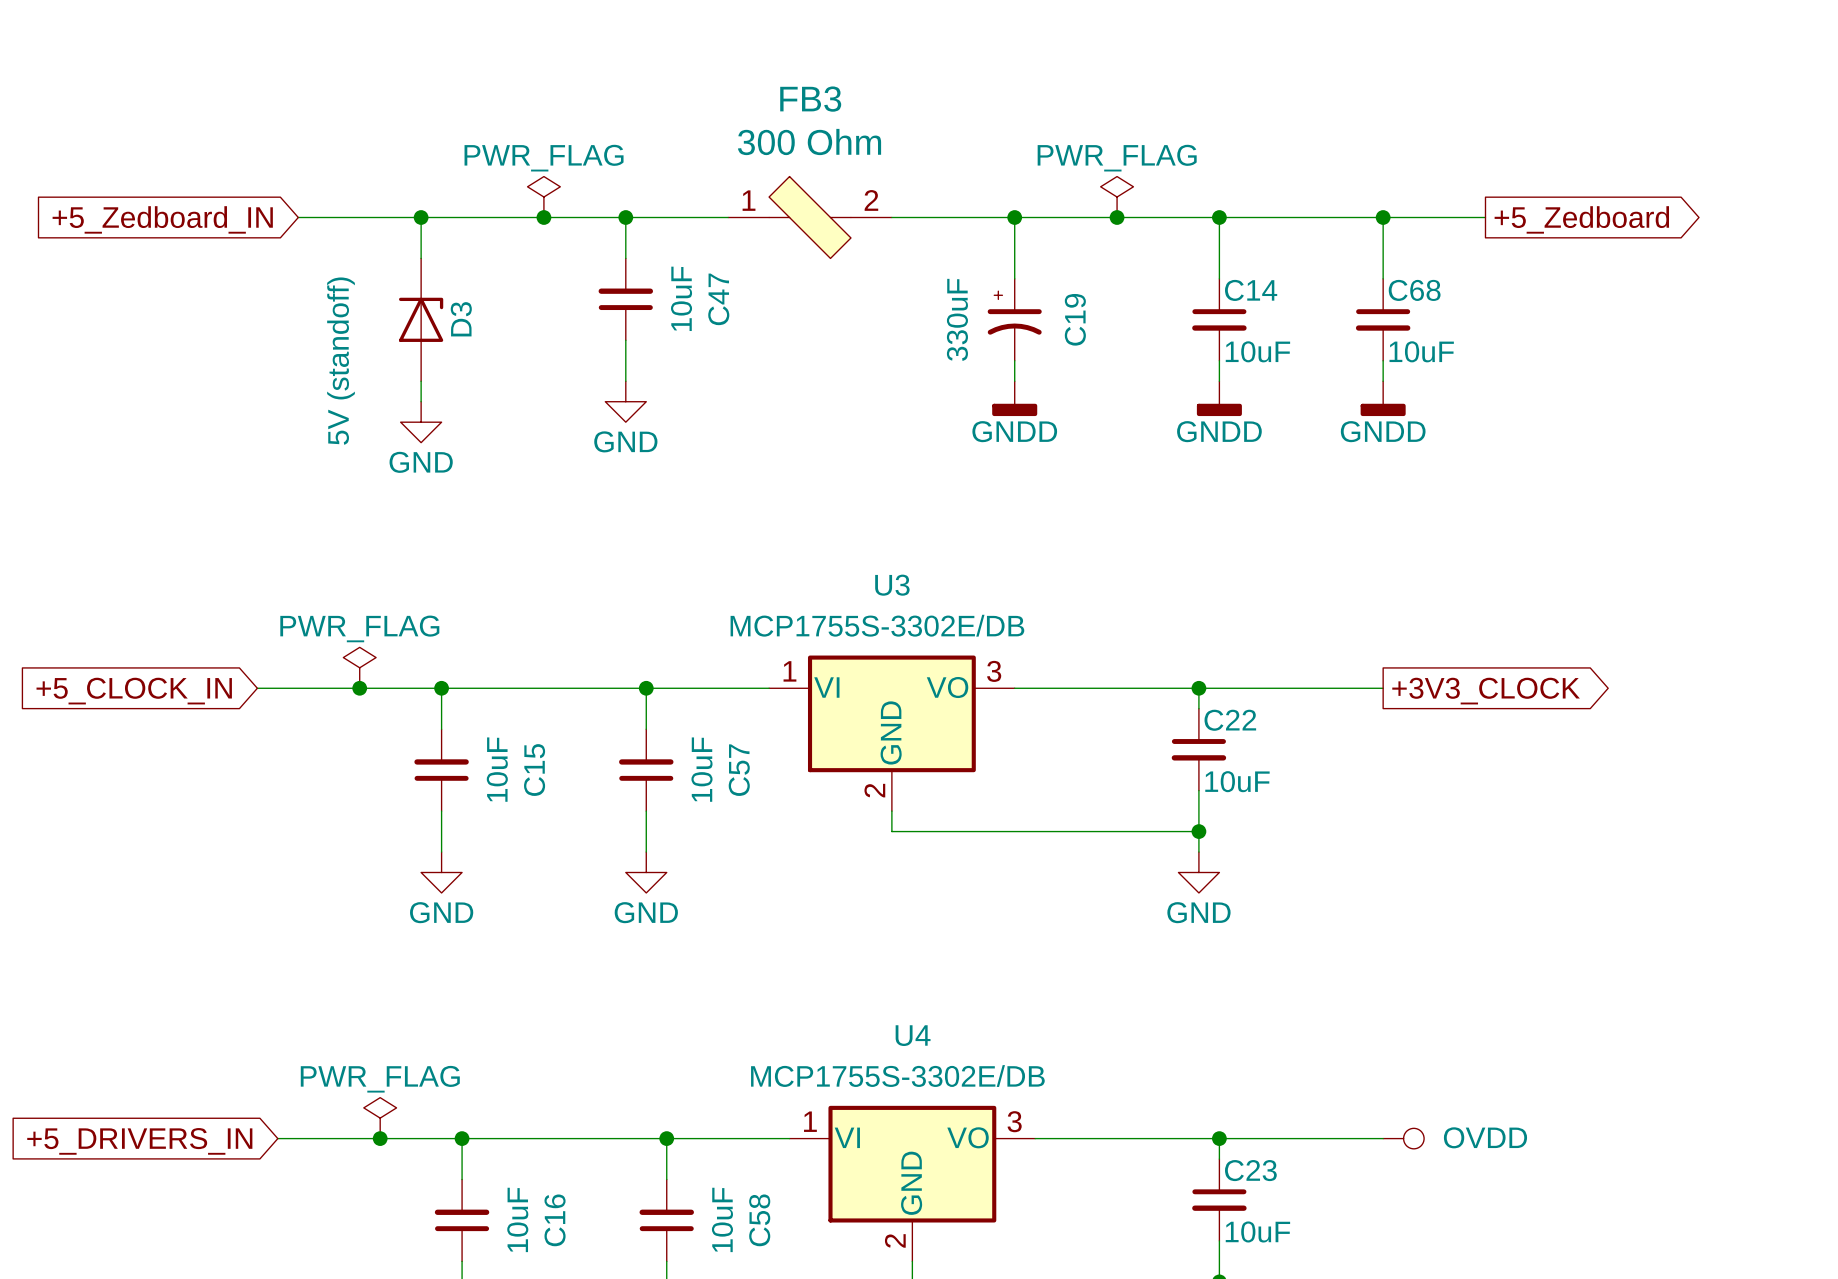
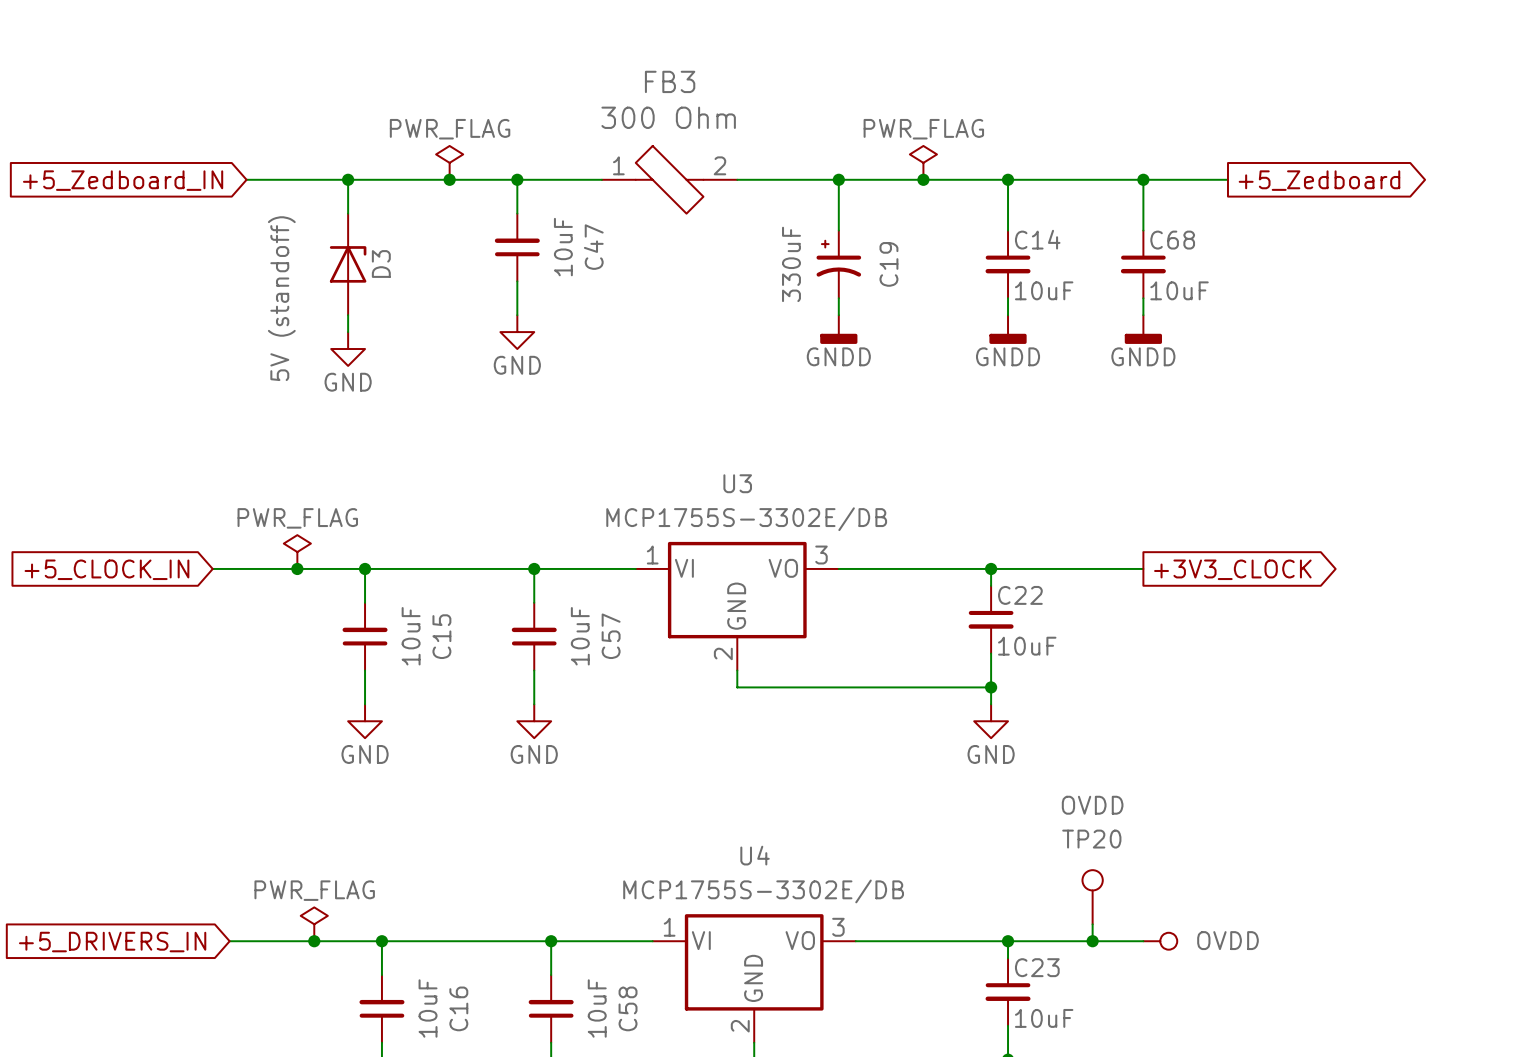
TP20: none -> OVDD (1092, 897)
wire: none -> (1092, 924) (1092, 941)
junction: none -> (1092, 941)

